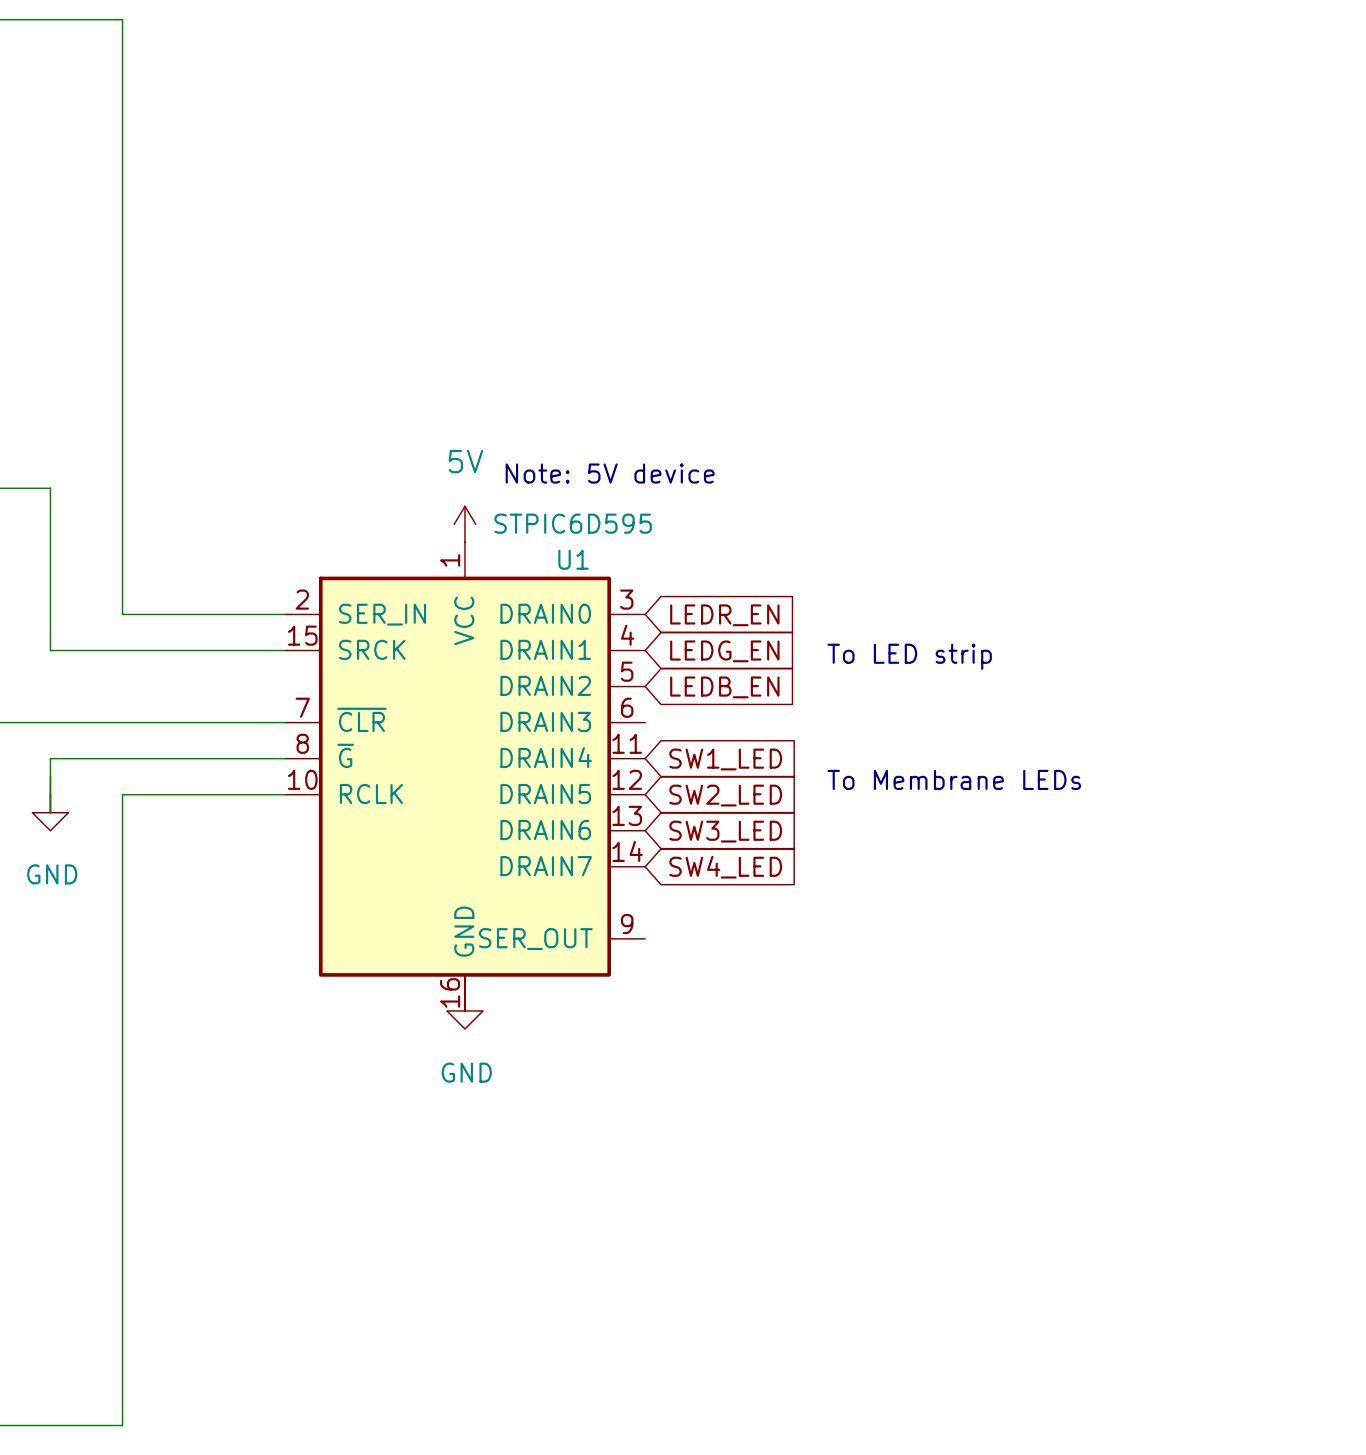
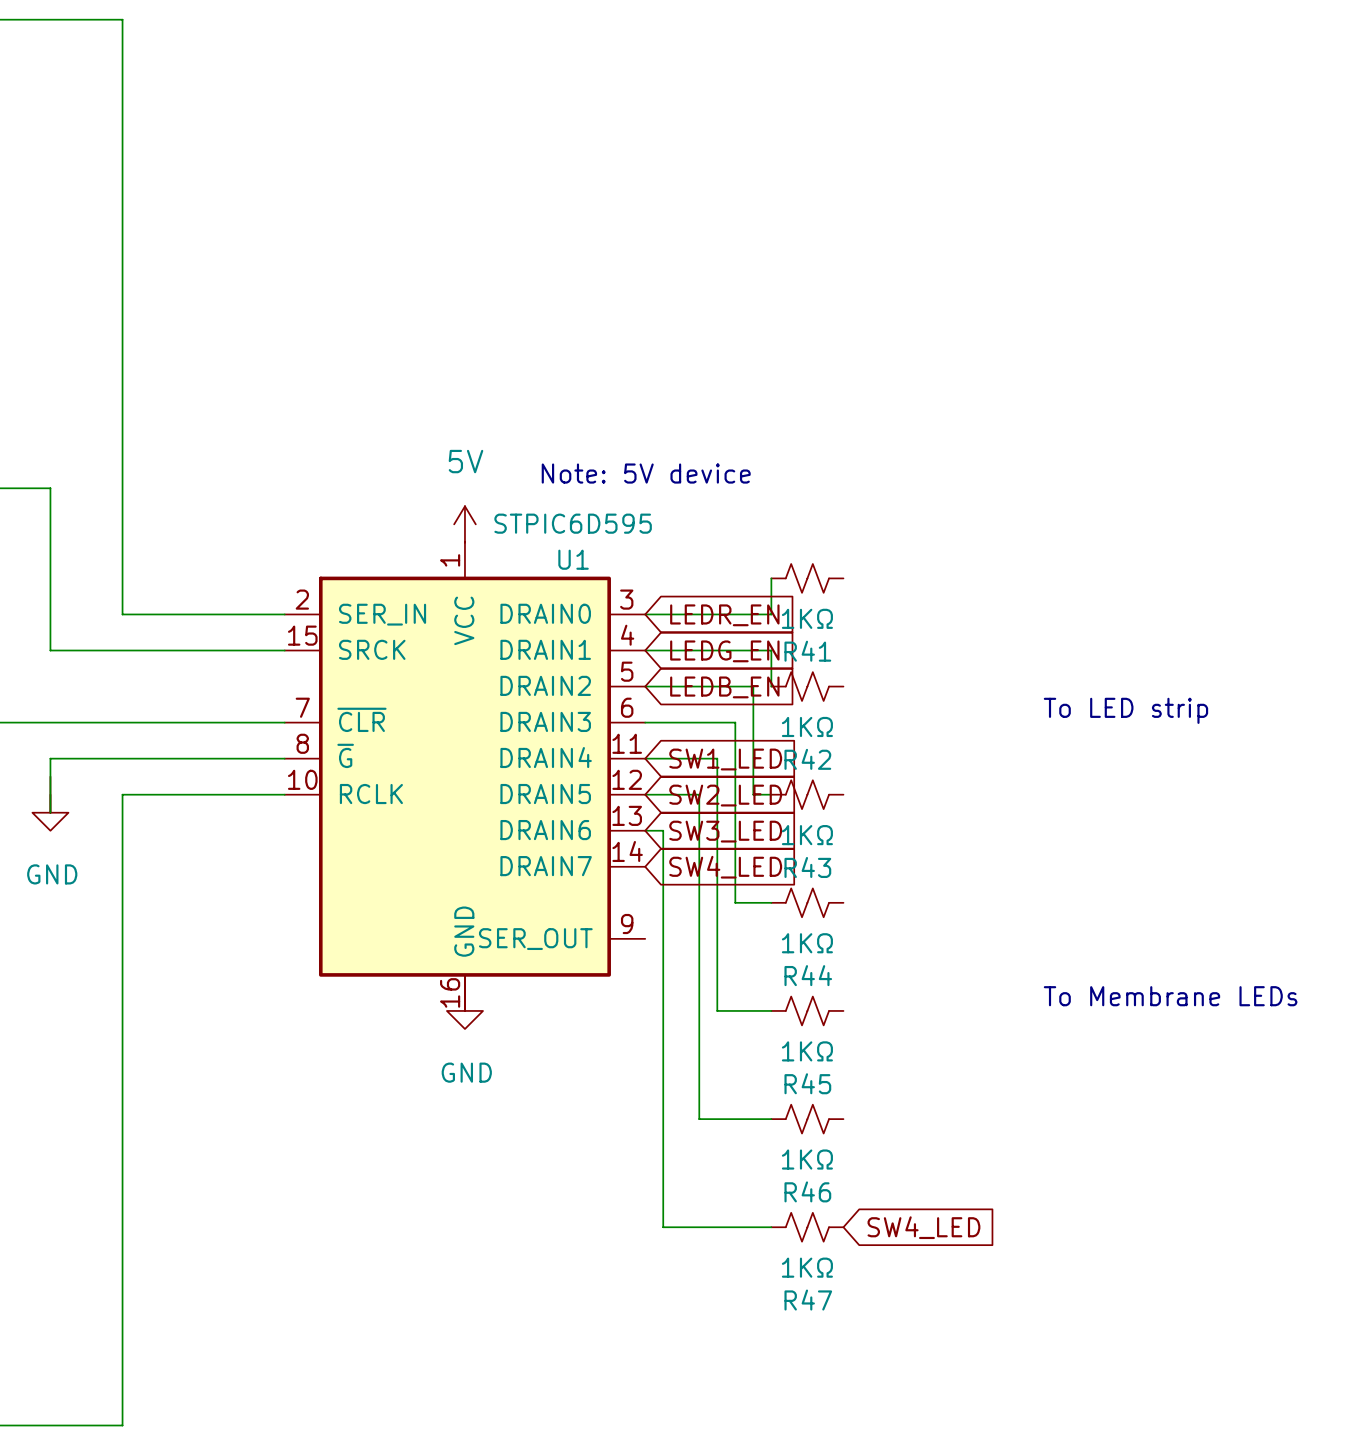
text position: Note: 5V device (610, 473) -> Note: 5V device (646, 473)
wire: none -> (771, 578) (771, 614) (645, 614)
R41: none -> (807, 578)
wire: none -> (645, 650) (771, 650) (771, 686)
text position: To LED strip (909, 656) -> To LED strip (1125, 710)
wire: none -> (645, 686) (753, 686) (753, 794) (771, 794)
R42: none -> (807, 686)
wire: none -> (645, 722) (735, 722) (735, 902) (771, 902)
wire: none -> (645, 758) (717, 758) (717, 1010) (771, 1010)
text position: To Membrane LEDs (954, 779) -> To Membrane LEDs (1170, 996)
wire: none -> (645, 794) (699, 794) (699, 1119) (771, 1119)
R43: none -> (807, 794)
wire: none -> (645, 830) (663, 830) (663, 1227) (771, 1227)
R44: none -> (807, 902)
R45: none -> (807, 1010)
R46: none -> (807, 1119)
R47: none -> (807, 1227)
global label: none -> SW4_LED (923, 1227)

